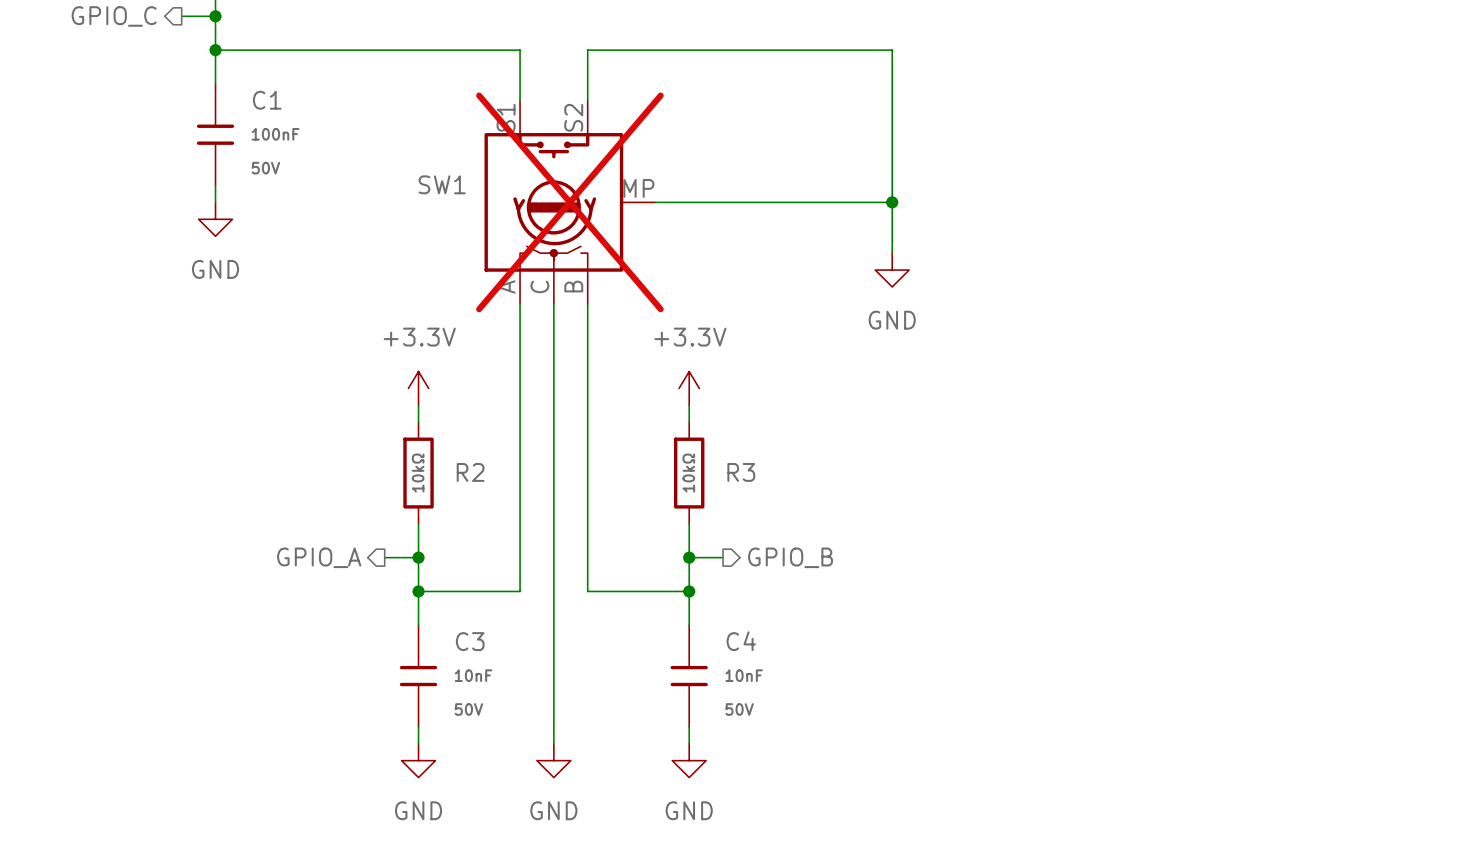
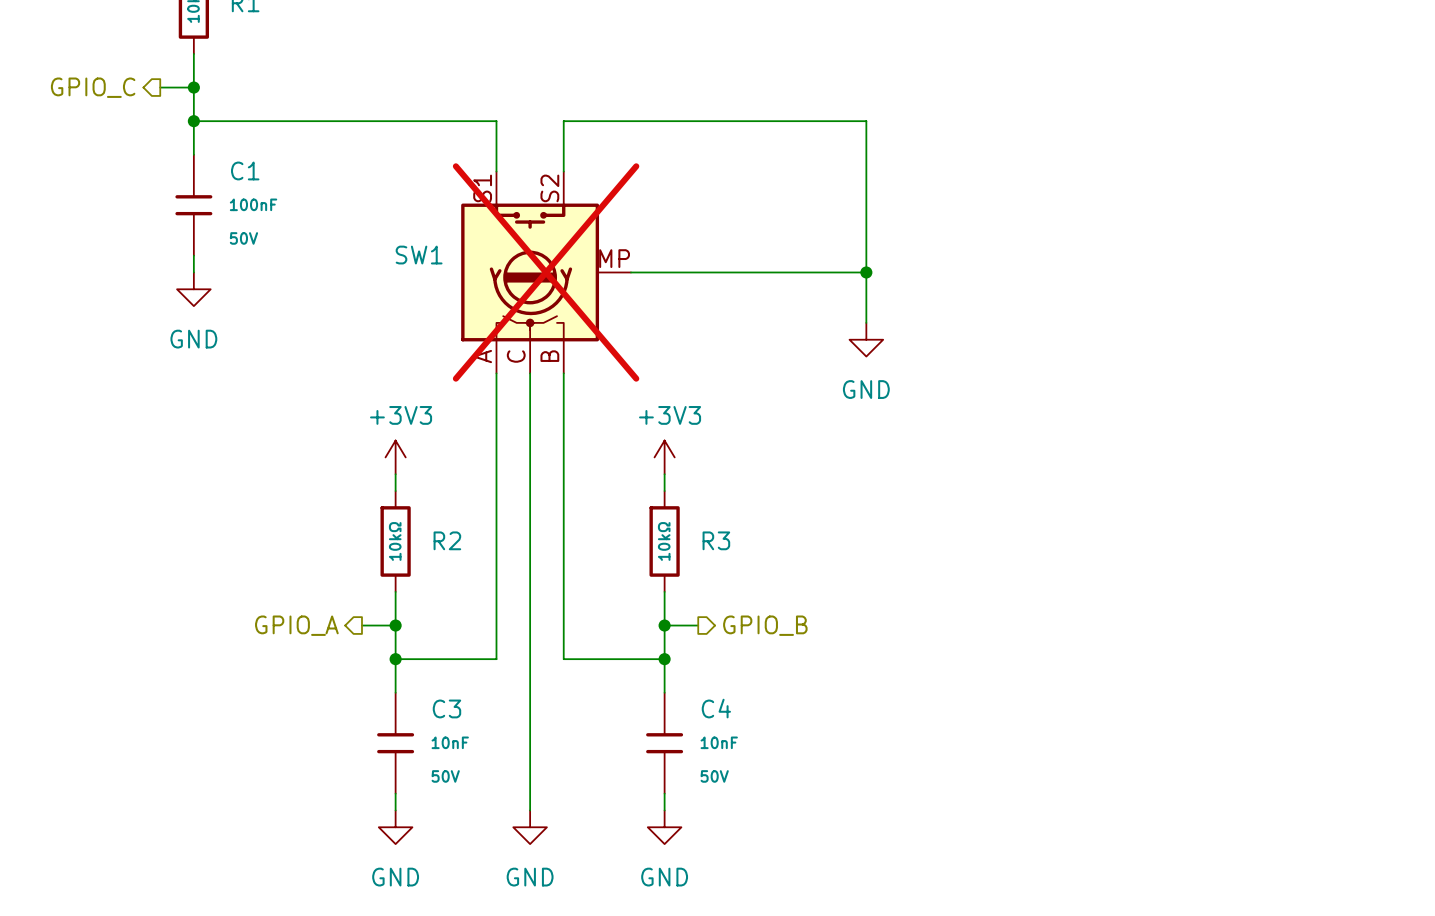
power symbol: +3.3V (418, 388) -> +3V3 (395, 457)
power symbol: +3.3V (689, 388) -> +3V3 (664, 457)

